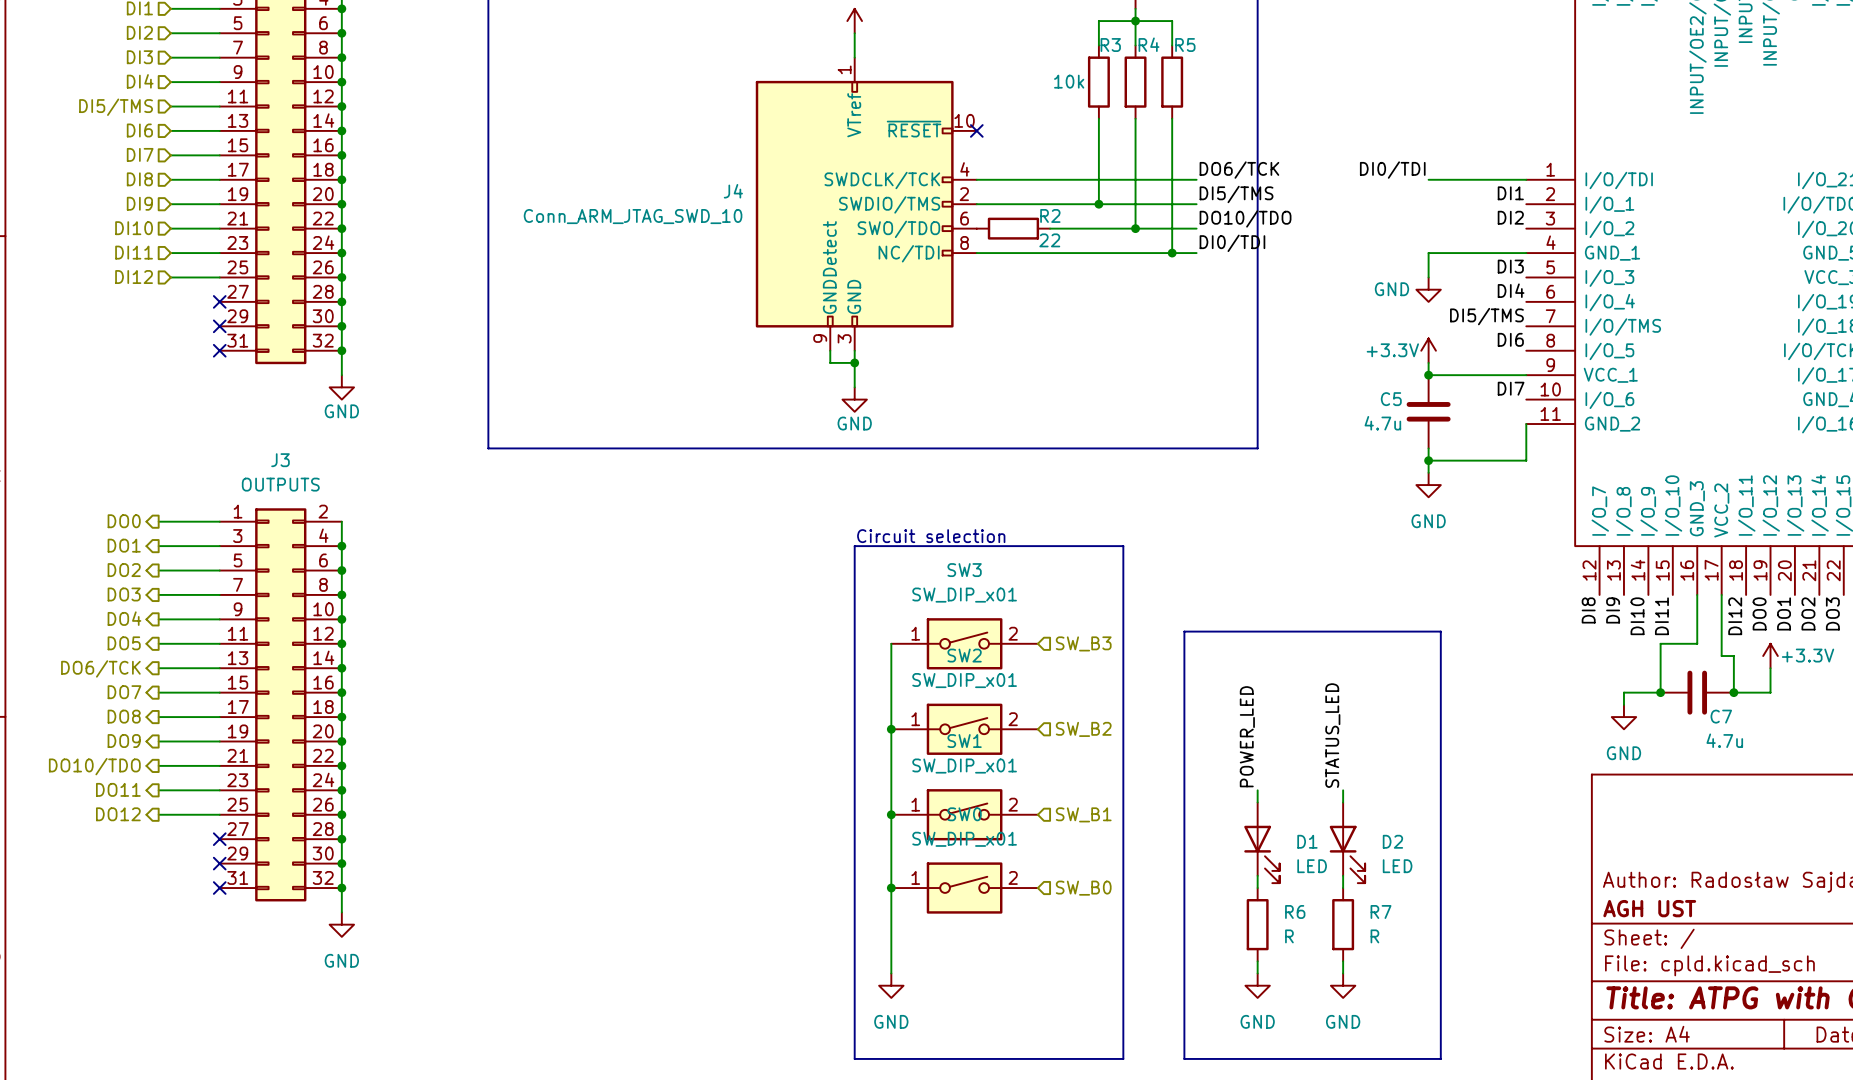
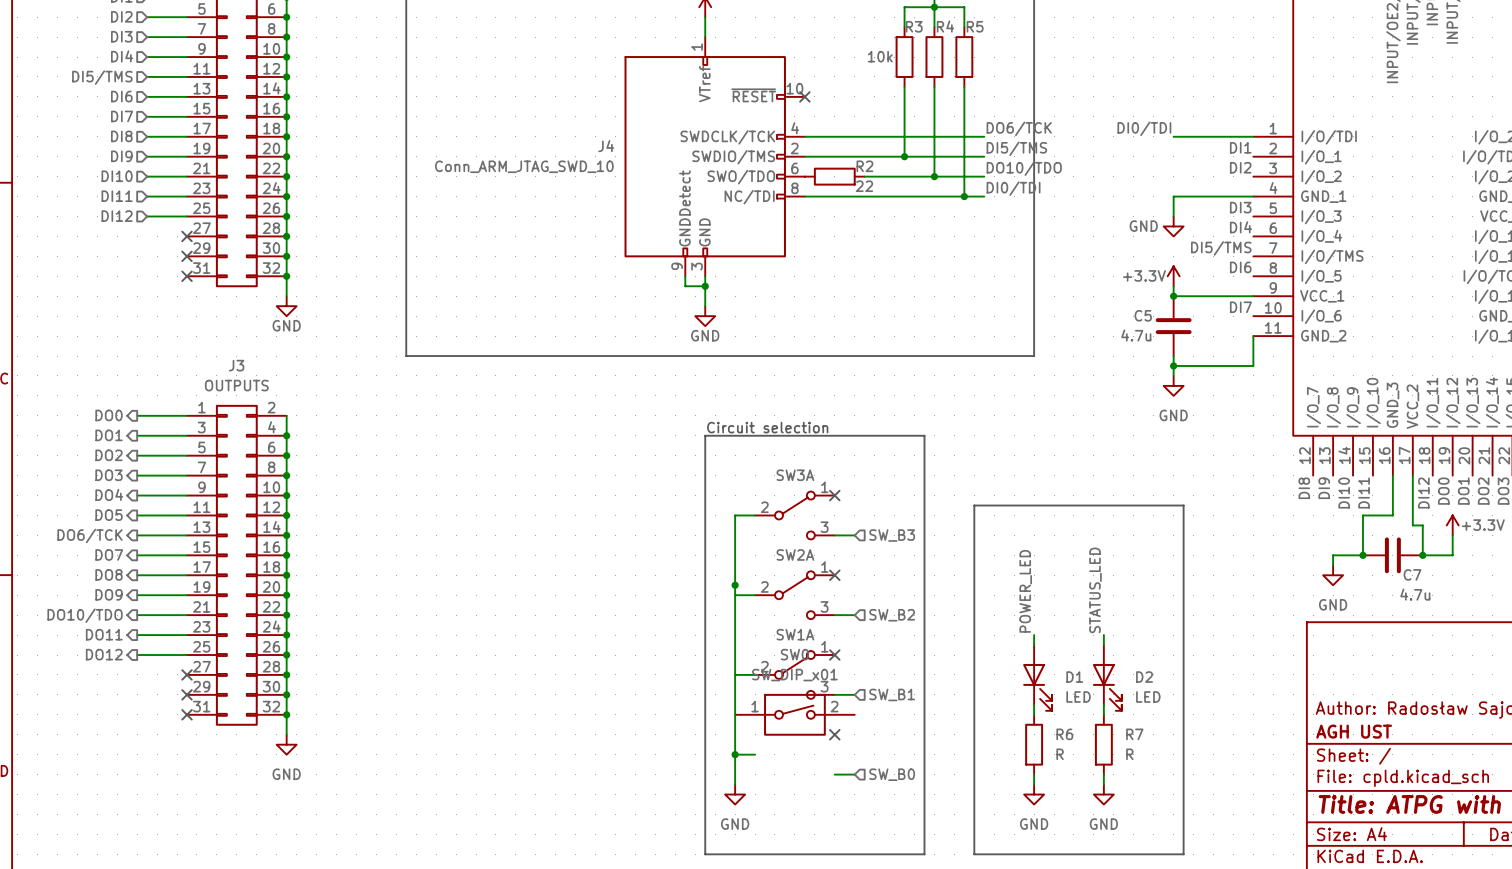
no-connect mark: none -> (834, 495)
SW3: SW_DIP_x01 (964, 643) -> none
SW3A: none -> (794, 515)
hierarchical label position: SW_B3 (1083, 643) -> SW_B3 (892, 535)
wire: none -> (834, 535) (854, 535)
no-connect mark: none -> (834, 575)
SW2: SW_DIP_x01 (964, 729) -> none
hierarchical label position: SW_B2 (1083, 729) -> SW_B2 (892, 615)
wire: none -> (735, 595) (755, 595)
SW2A: none -> (794, 595)
wire: none -> (834, 615) (854, 615)
junction: (891, 814) -> none
SW1: SW_DIP_x01 (964, 814) -> none
no-connect mark: none -> (834, 655)
hierarchical label position: SW_B1 (1083, 814) -> SW_B1 (892, 694)
wire: none -> (735, 674) (755, 674)
SW1A: none -> (794, 674)
wire: none -> (834, 694) (854, 694)
junction position: (891, 888) -> (735, 754)
hierarchical label position: SW_B0 (1083, 888) -> SW_B0 (892, 774)
no-connect mark: none -> (834, 734)
wire: none -> (735, 754) (755, 754)
wire: none -> (834, 774) (854, 774)

